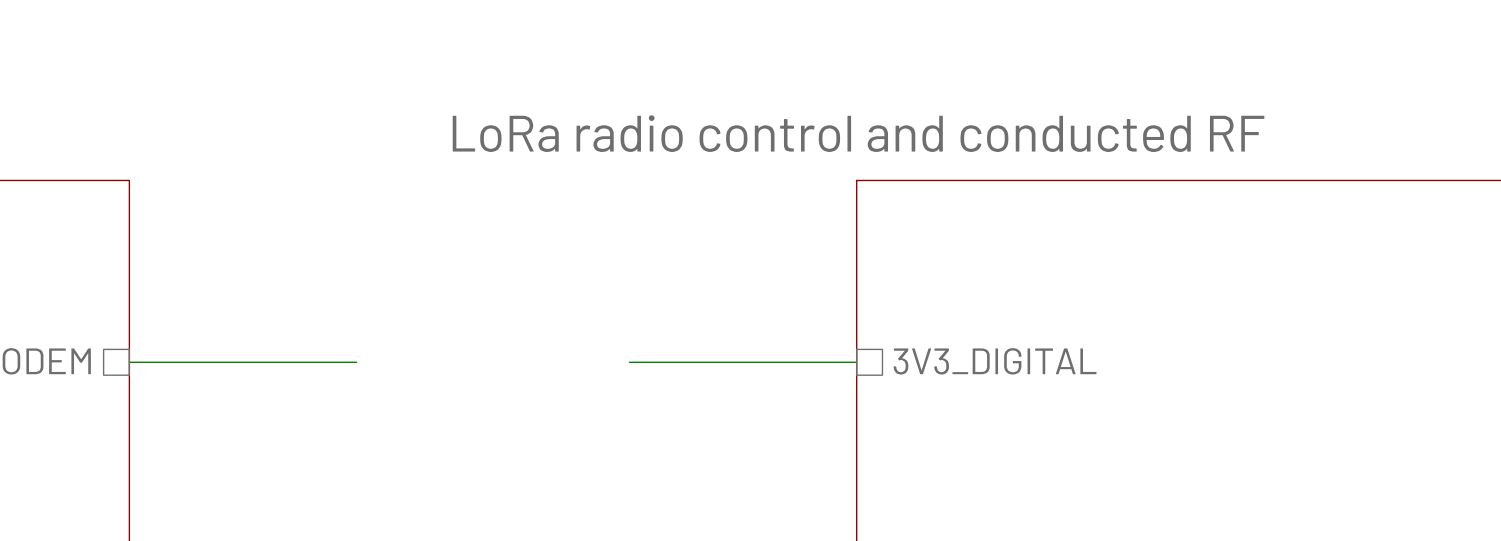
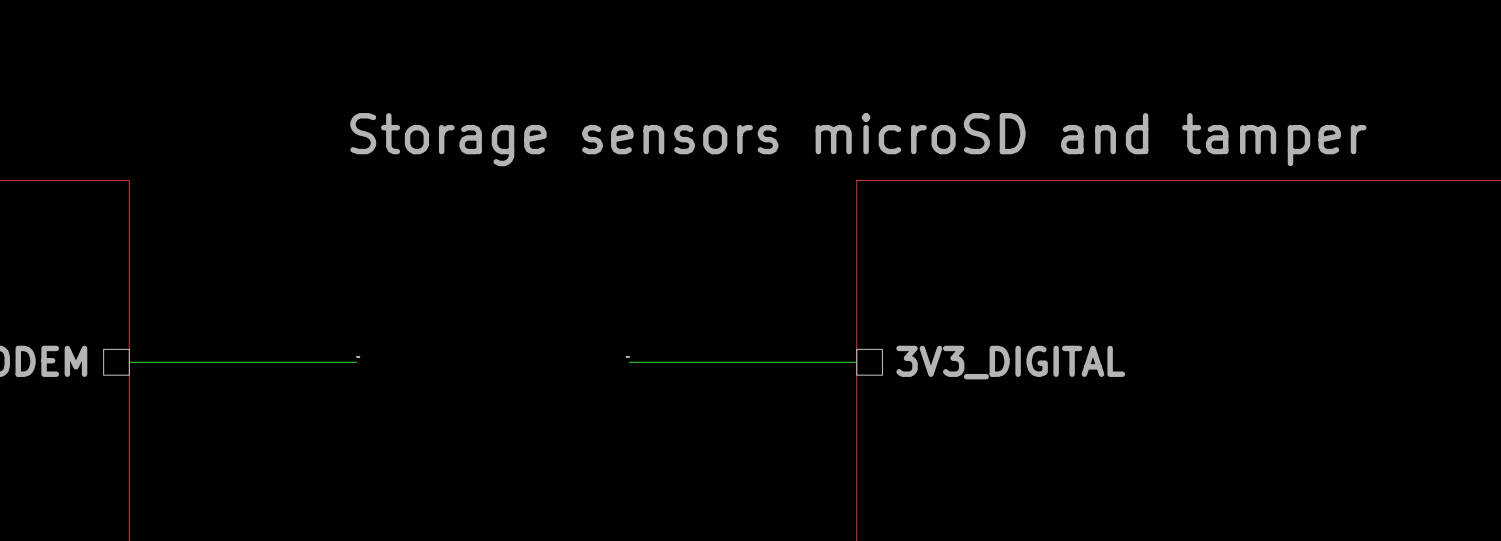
sheet LoRa radio control and conducted RF name: LoRa radio control and conducted RF (858, 133) -> Storage sensors microSD and tamper (858, 139)

